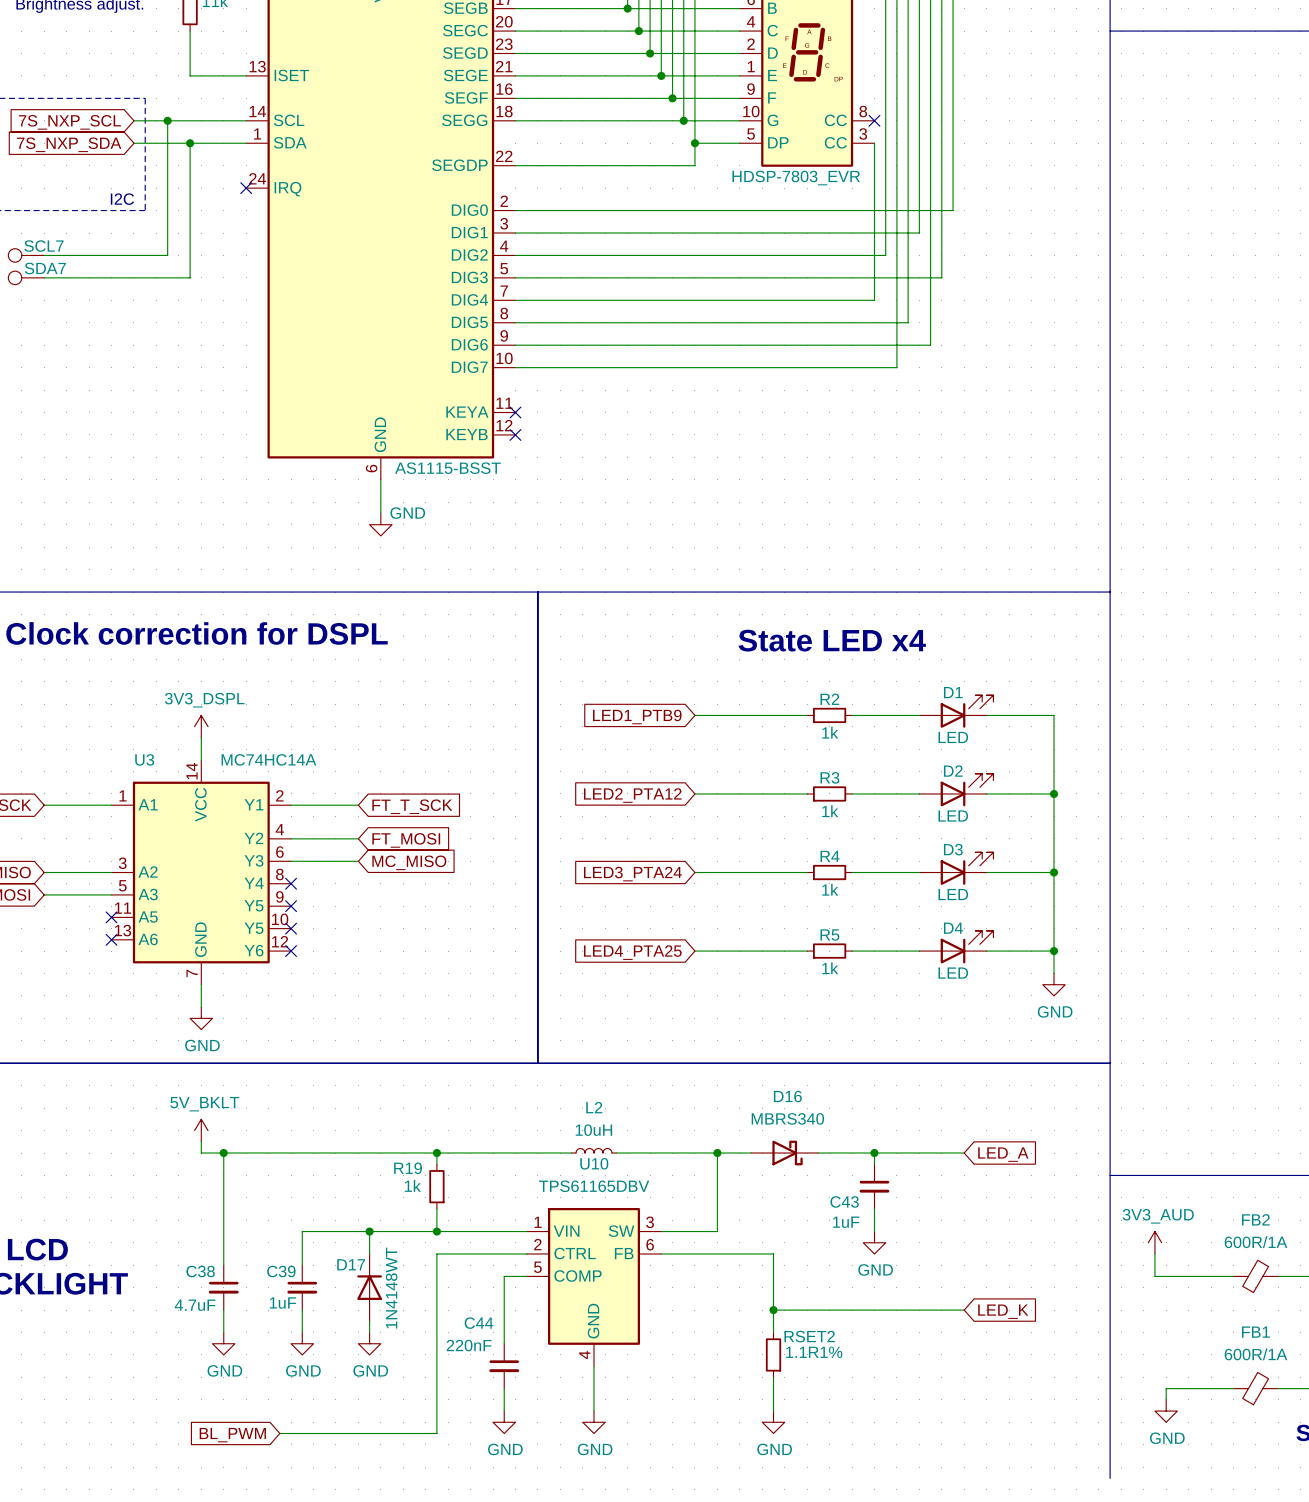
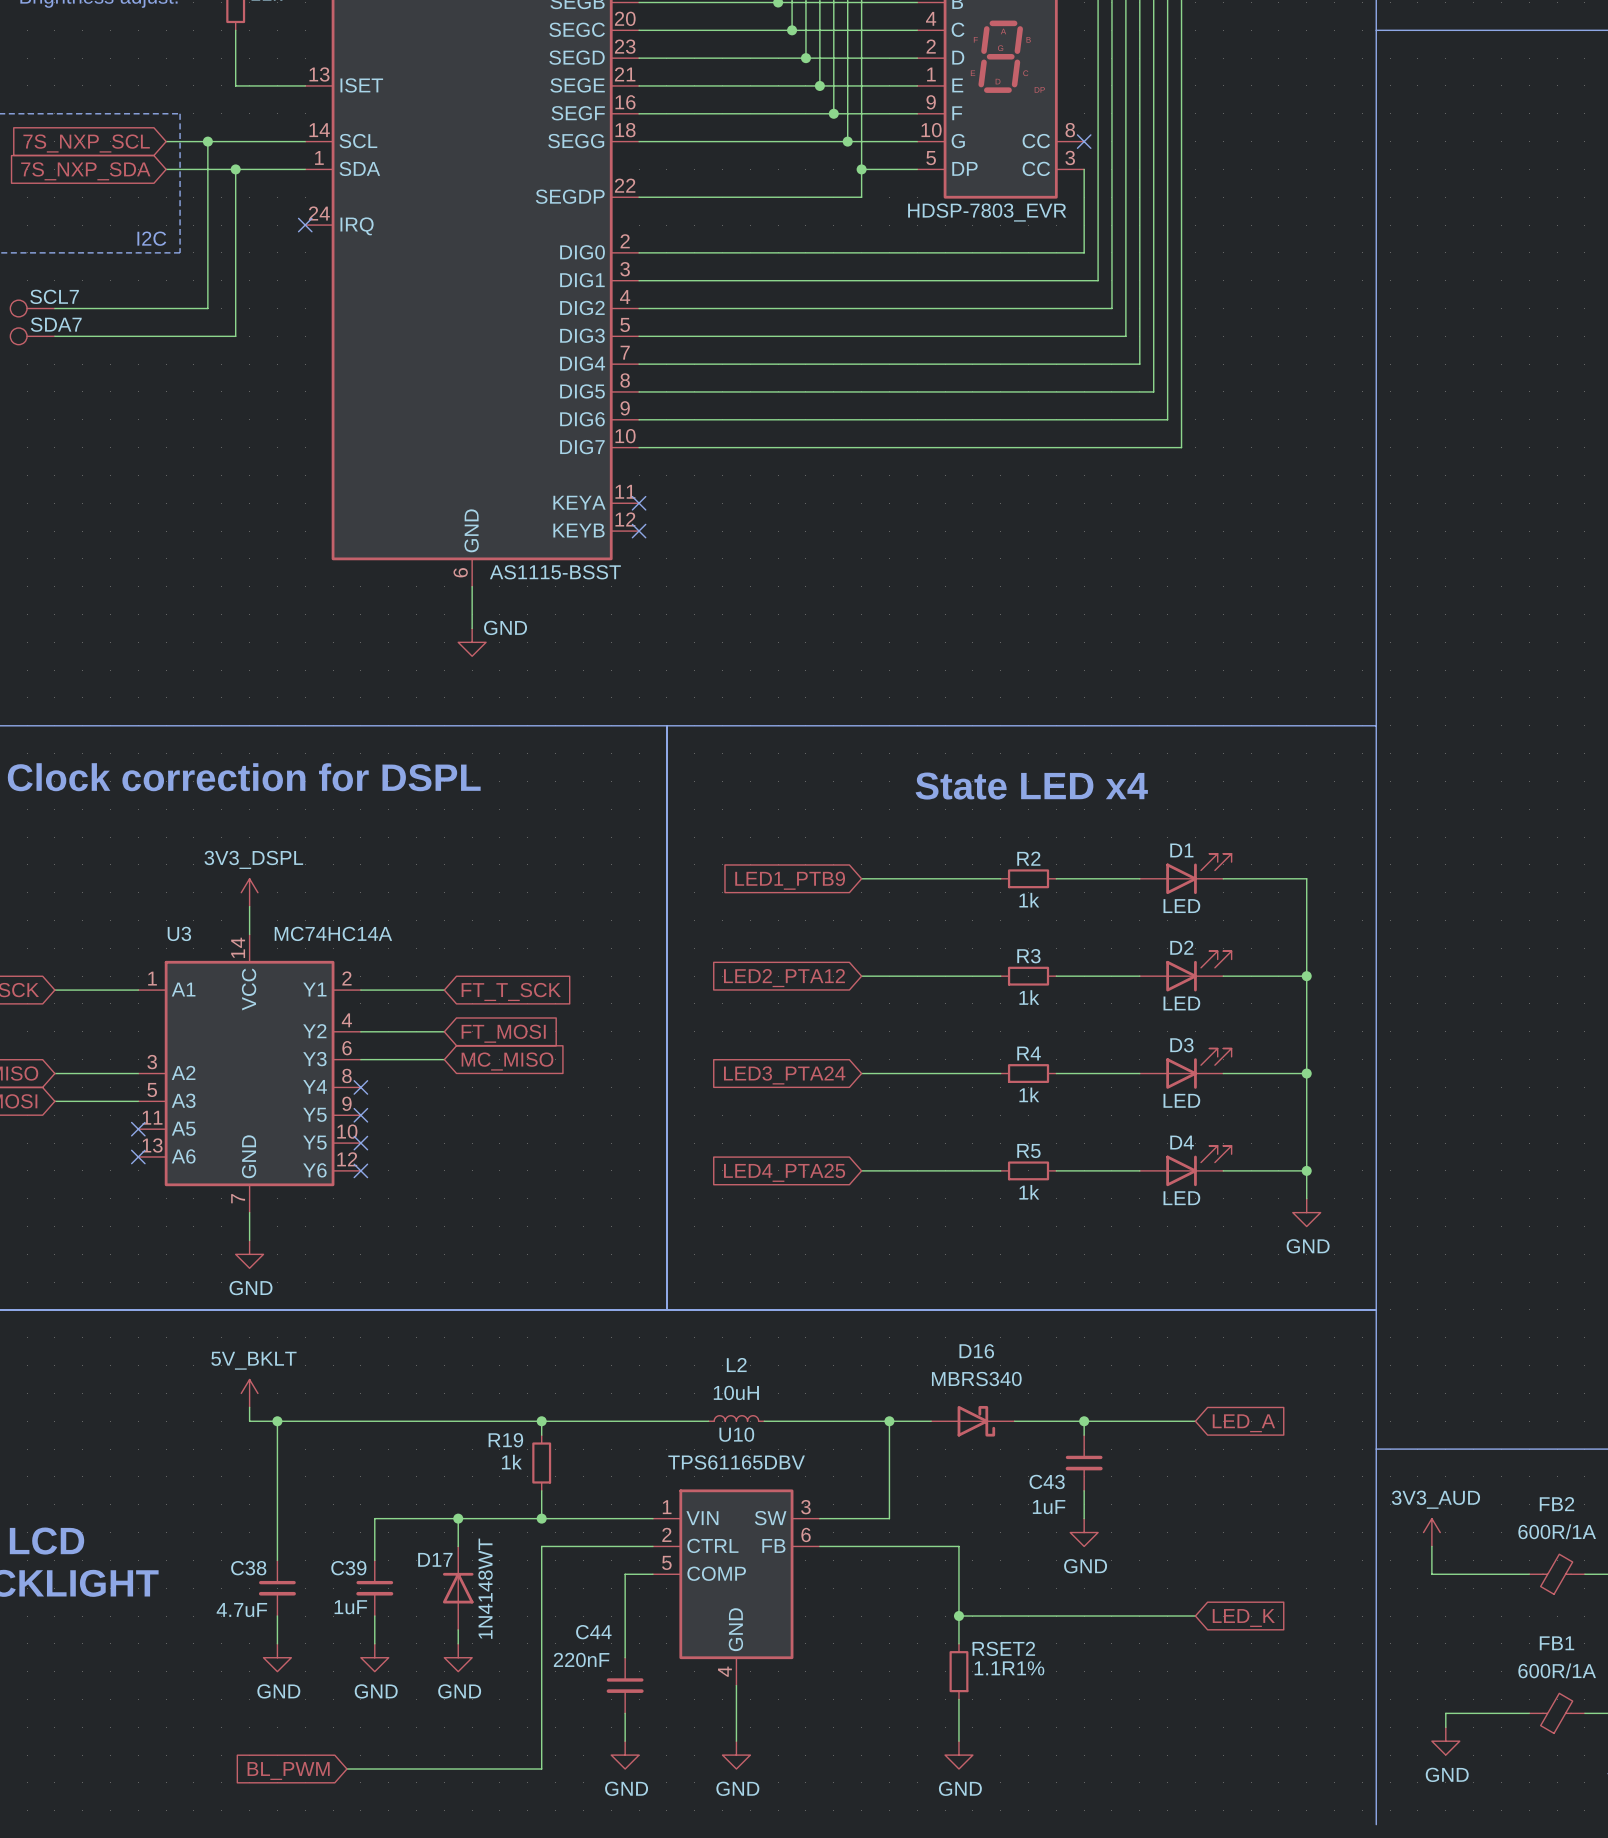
wire: (953, 210) (874, 210) (874, 300) -> (1139, 280) (1139, 364) (1084, 364)
wire: (919, 233) (885, 233) (885, 255) -> (1111, 308) (1098, 308)
wire: (896, 255) (896, 367) -> (1181, 252) (1181, 447) (1111, 447)
wire: (941, 277) (908, 277) (908, 322) -> (1167, 336) (1167, 419) (1153, 419)
wire: (930, 322) (930, 345) -> (1153, 391) (1125, 391)

